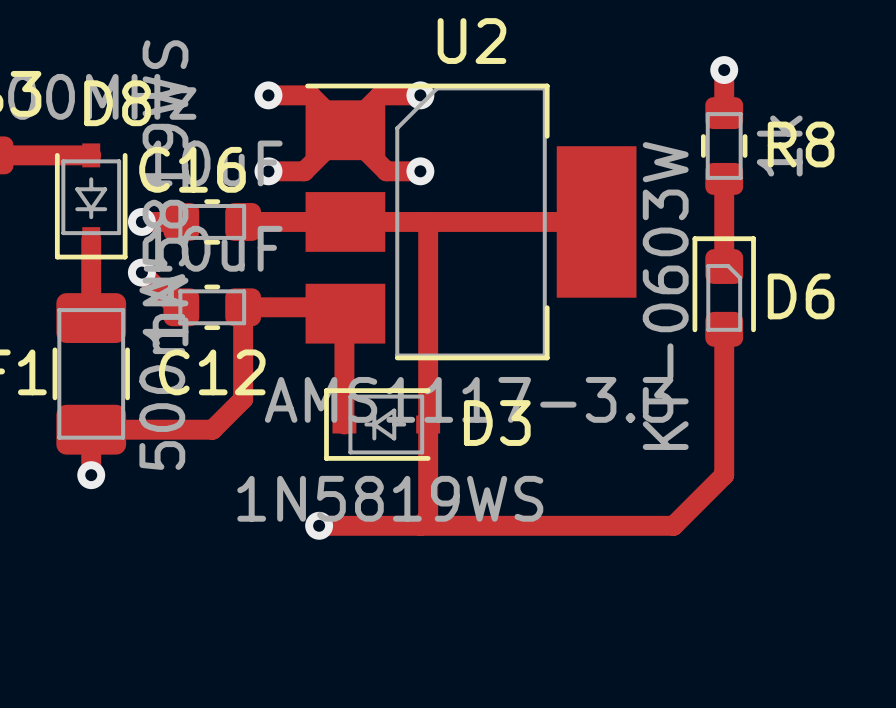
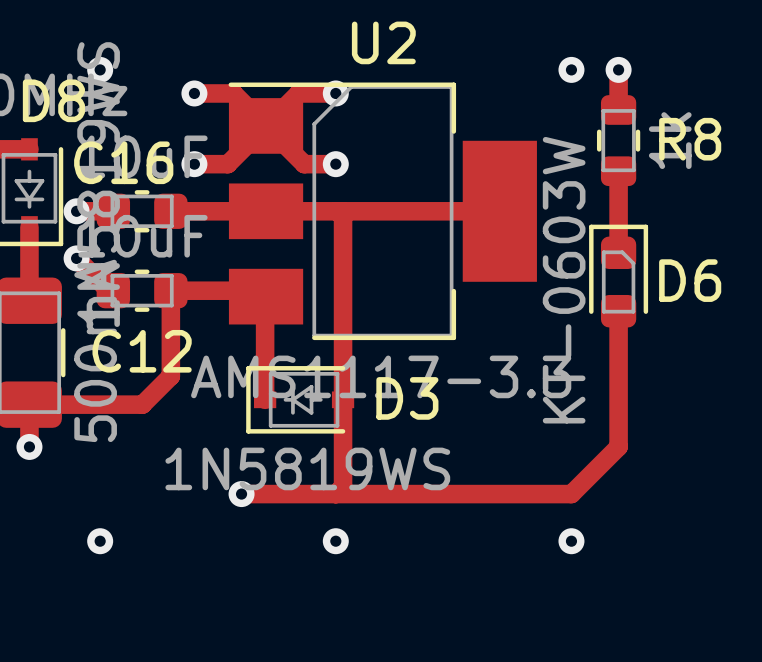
via: none -> (100, 69)
via: none -> (571, 69)
via: none -> (100, 541)
via: none -> (335, 541)
via: none -> (571, 541)

